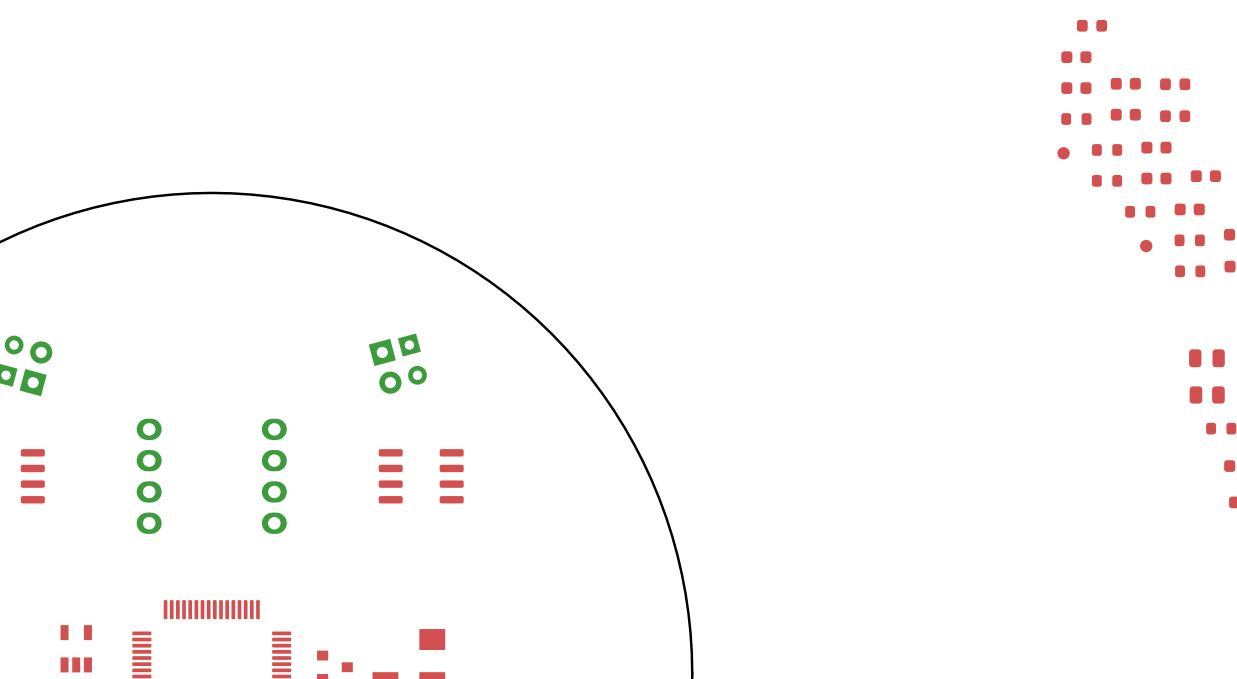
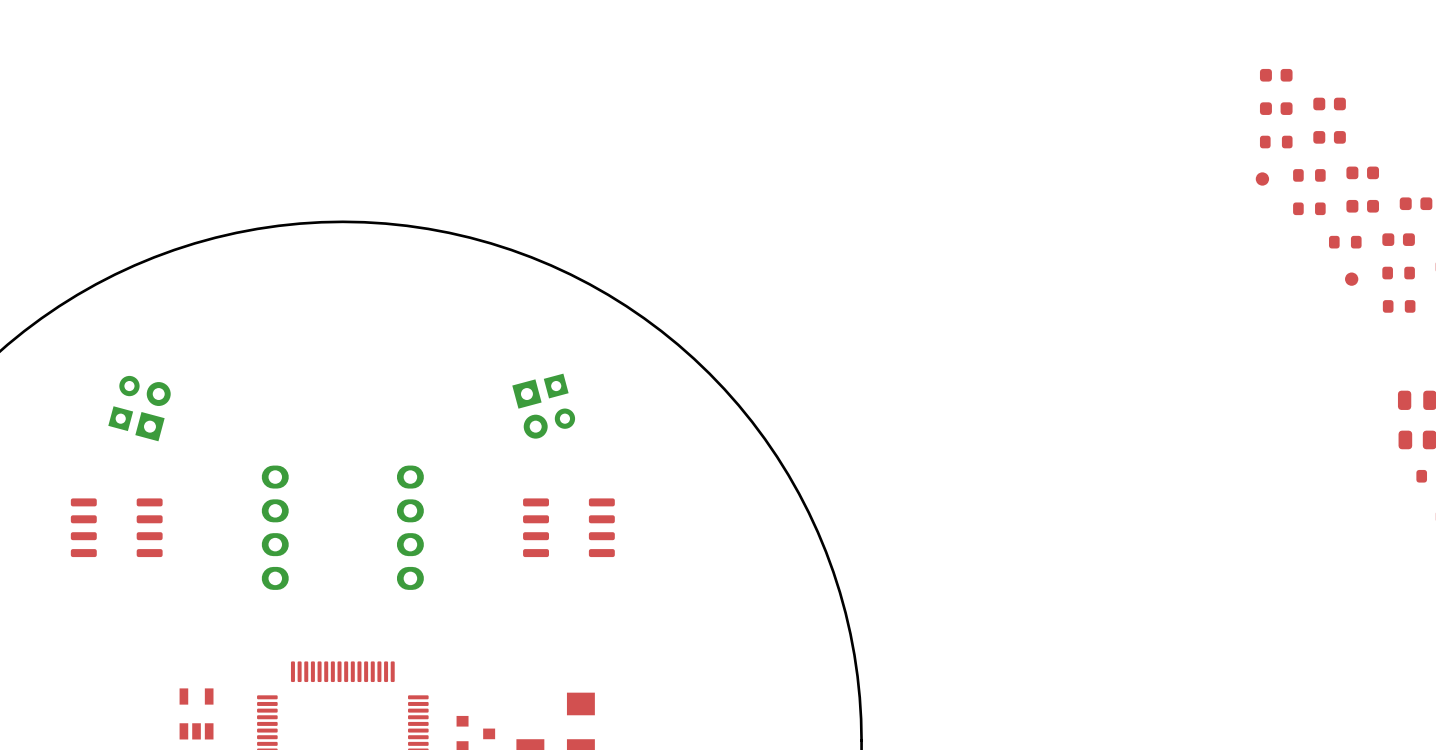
part: (1092, 25) -> none
part: (1175, 84) -> none
part: (1175, 116) -> none

